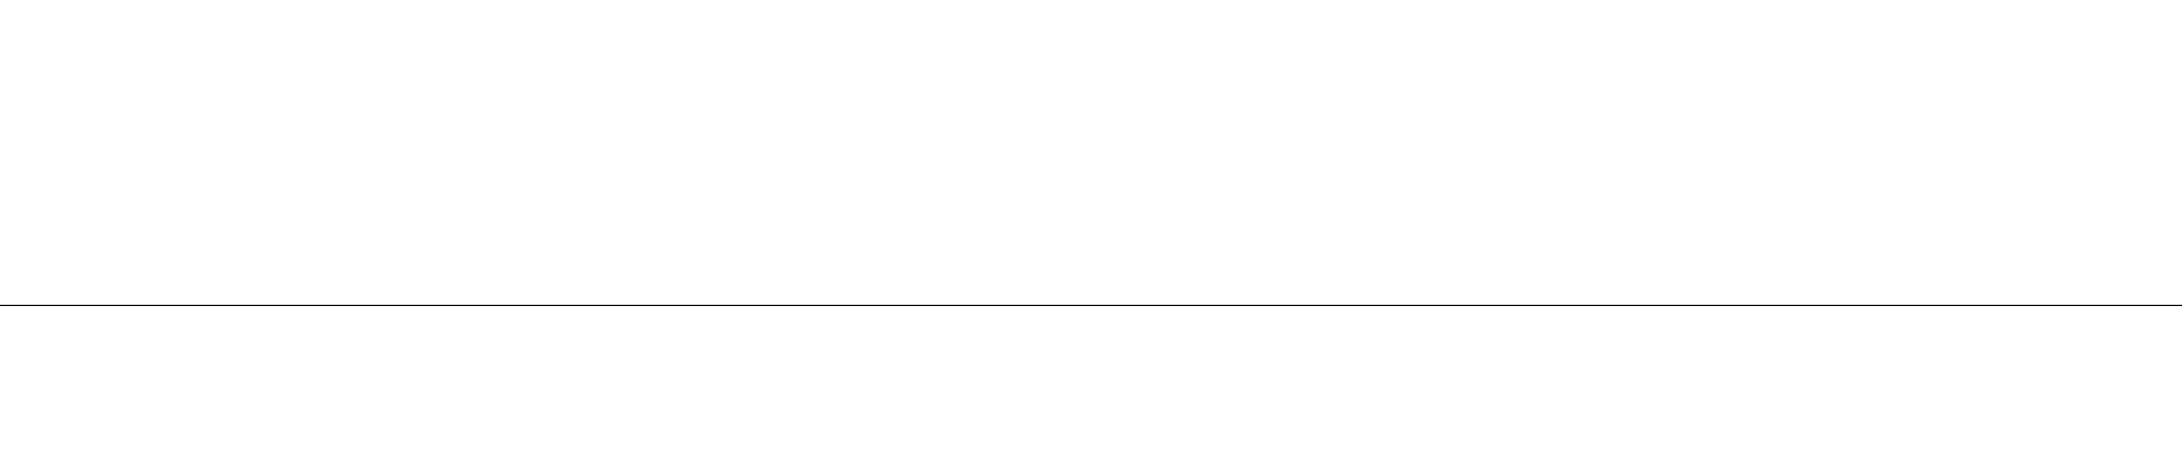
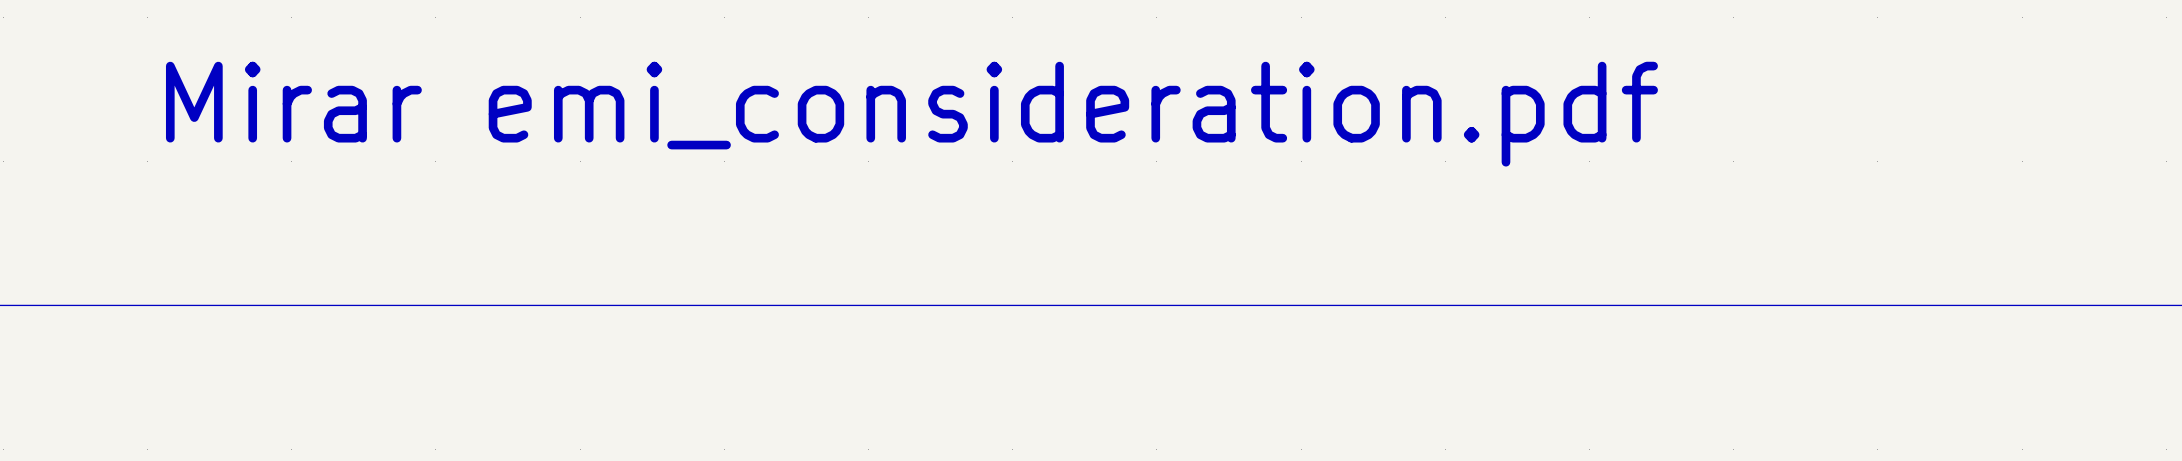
text: none -> Mirar emi_consideration.pdf (911, 114)

